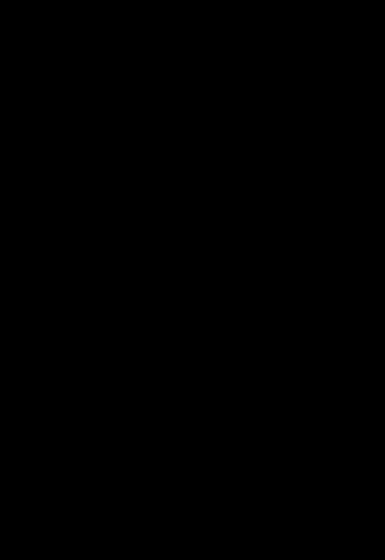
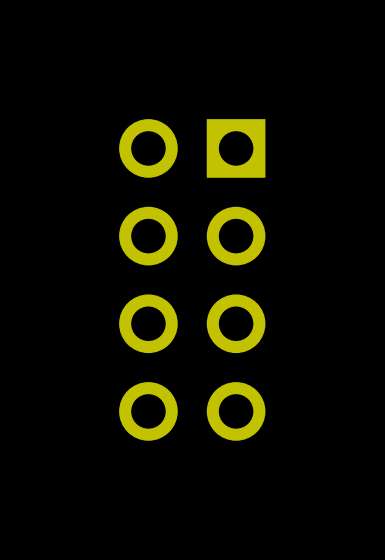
part: none -> (192, 279)

